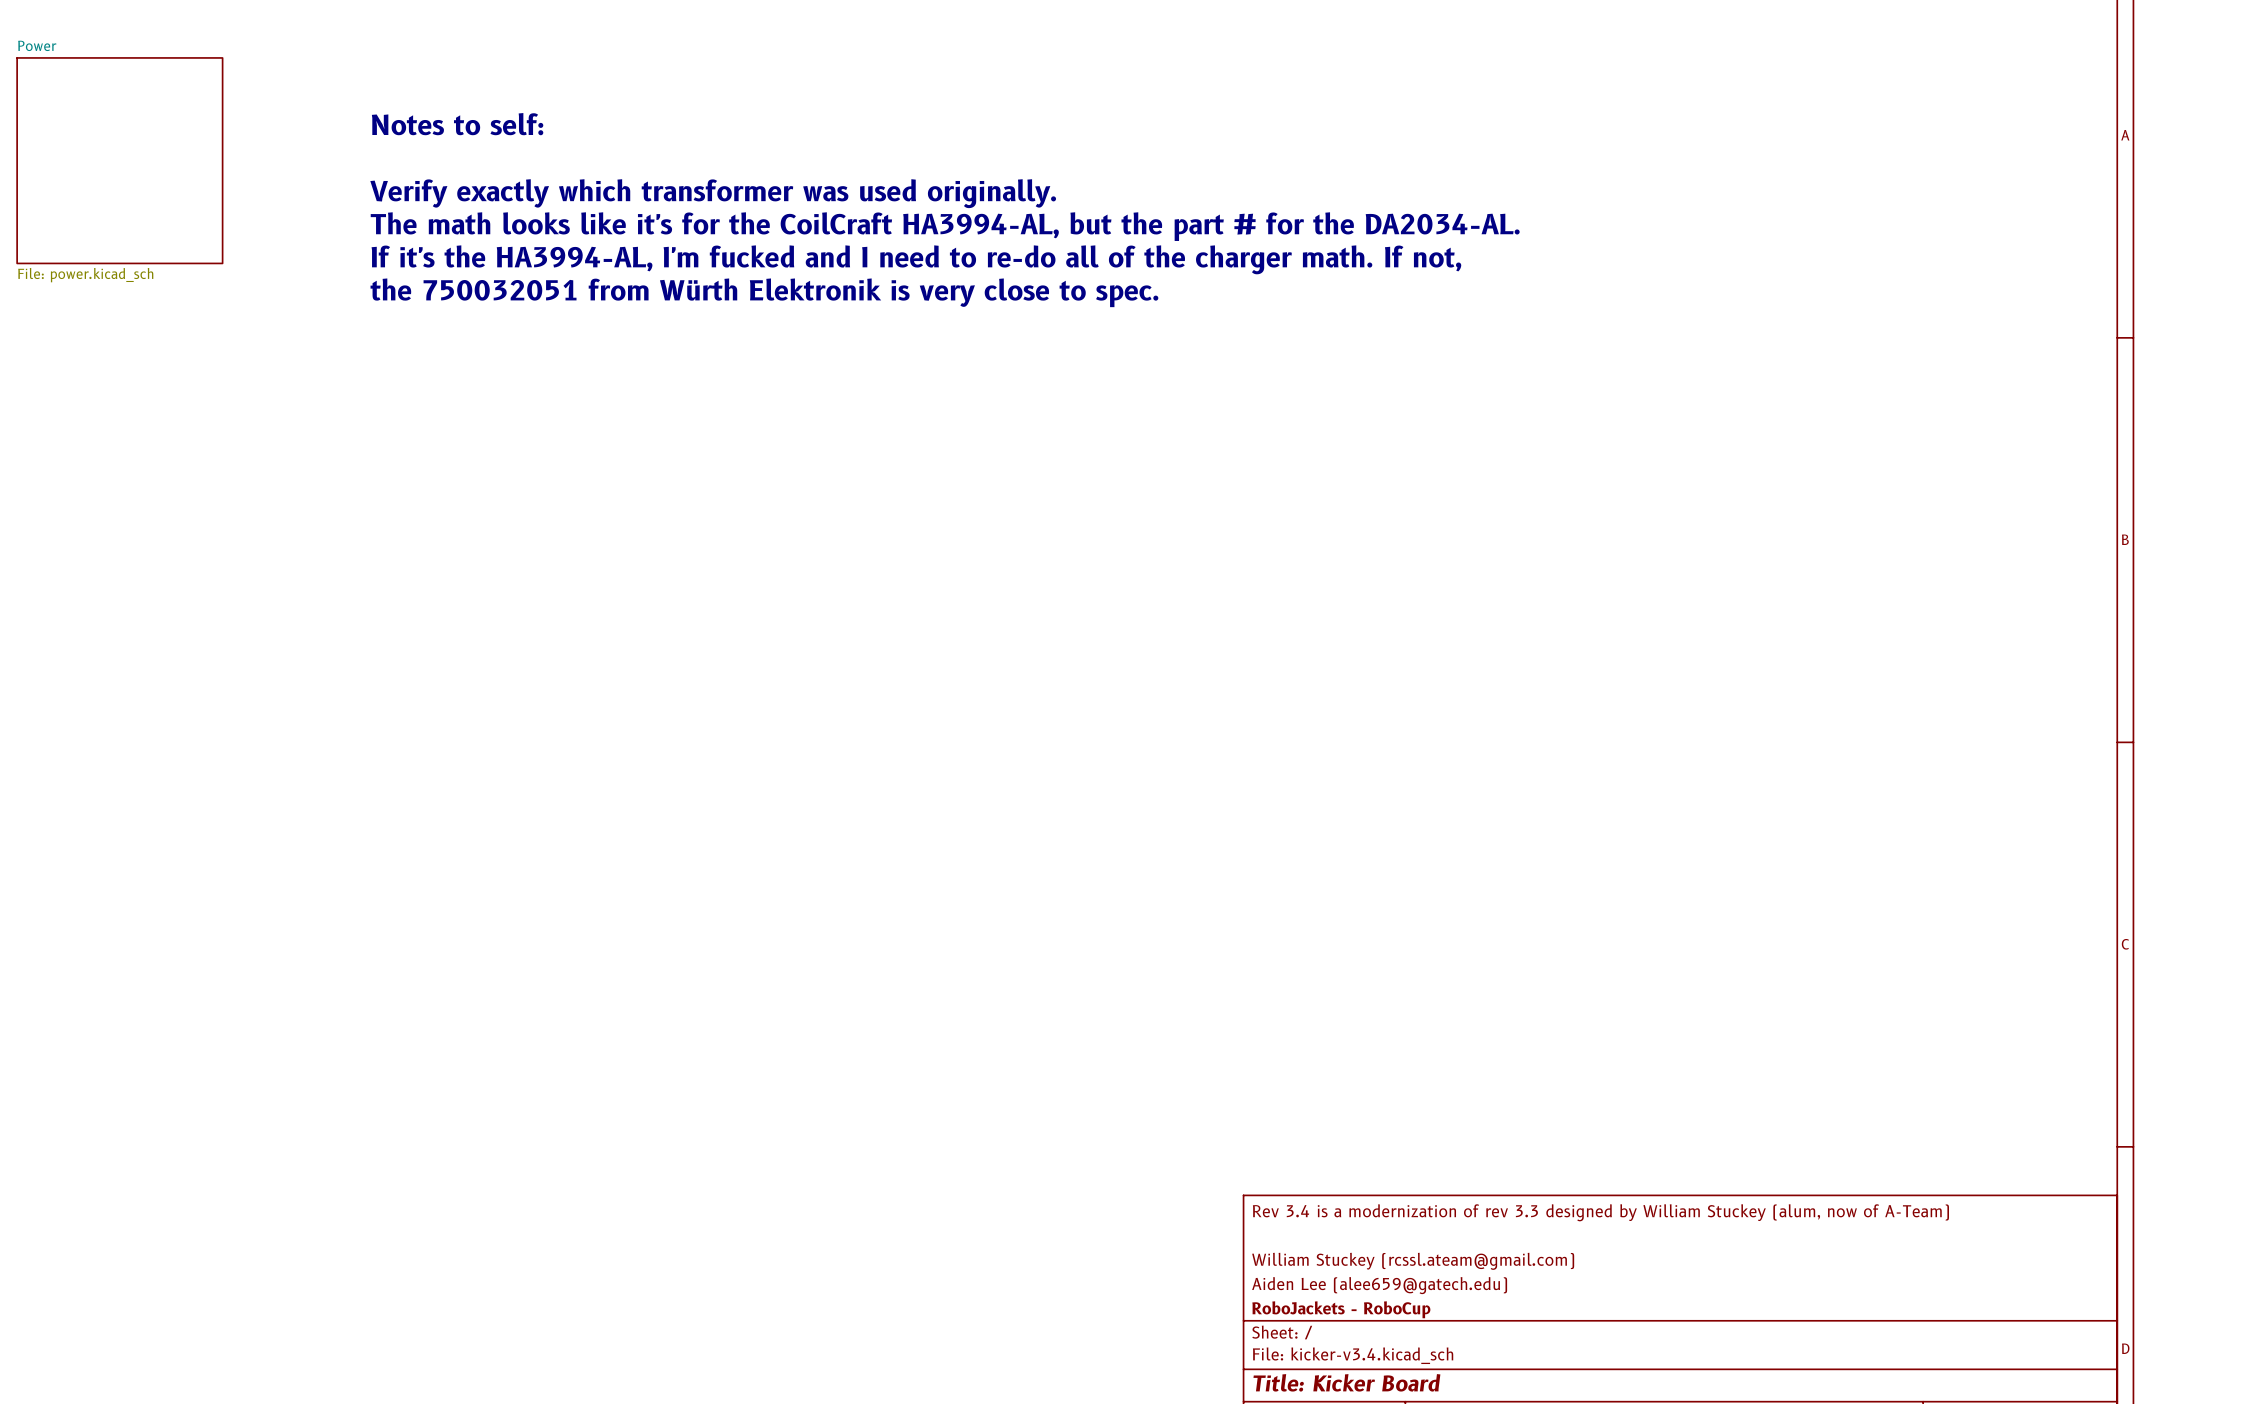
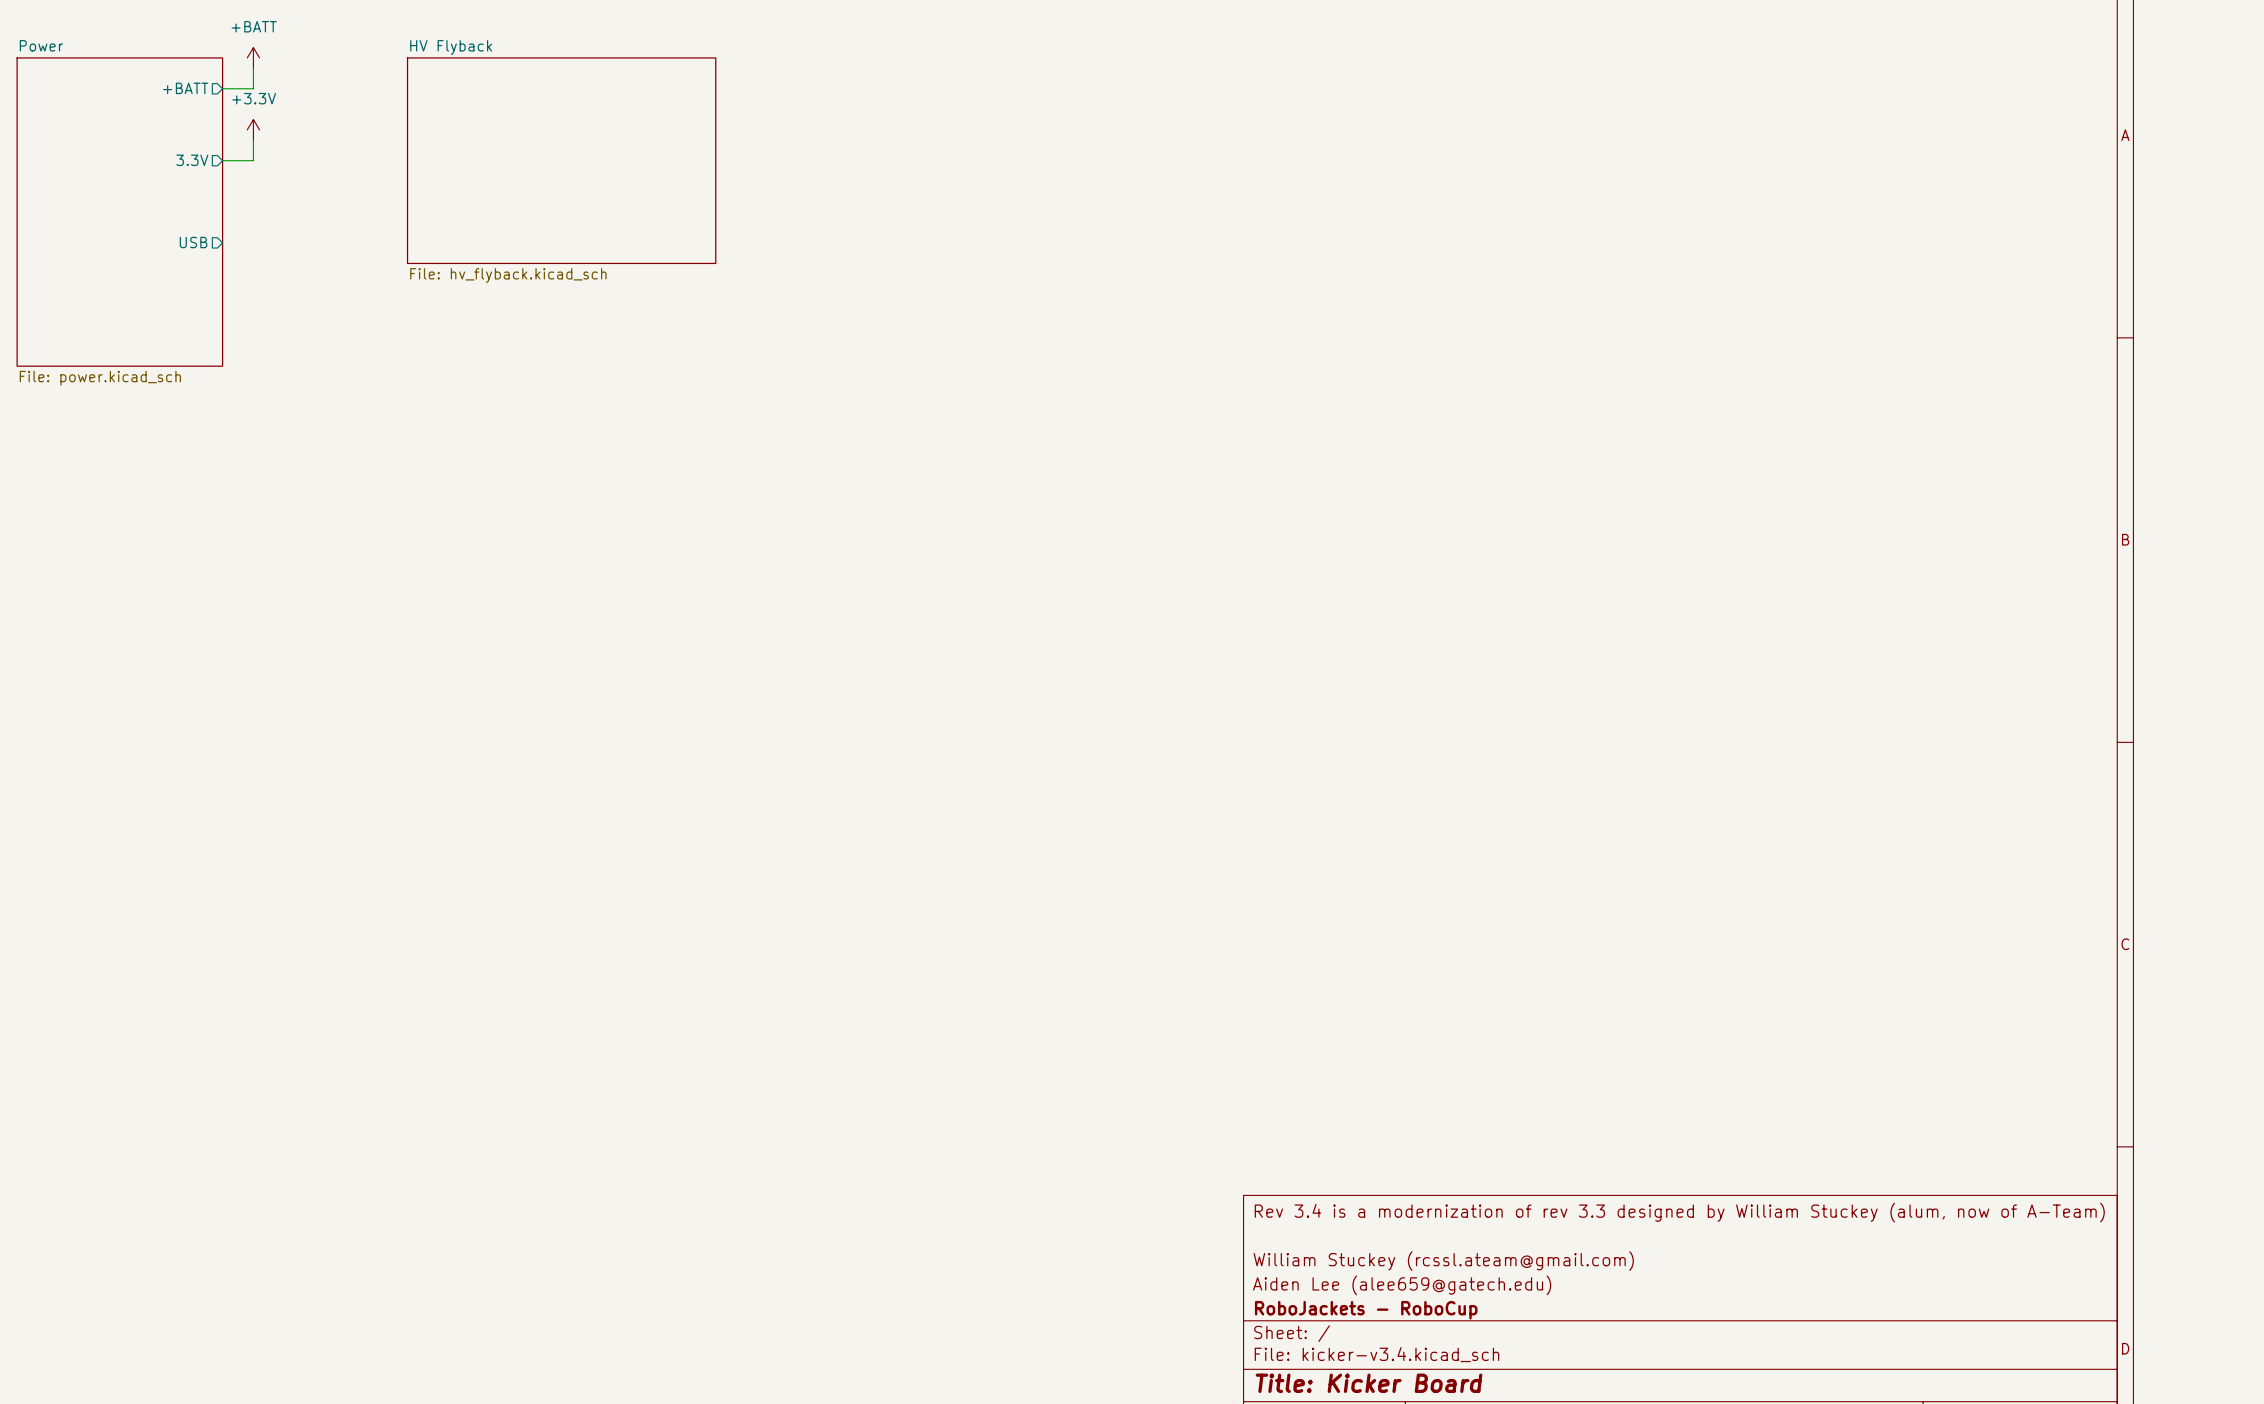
power symbol: none -> +BATT (253, 57)
wire: none -> (253, 68) (253, 88) (222, 88)
sheet pin: none -> +BATT (185, 88)
text: Notes to self: (457, 124) -> none
power symbol: none -> +3.3V (253, 129)
wire: none -> (253, 140) (253, 160) (222, 160)
sheet Power: File: power.kicad_sch (119, 160) -> none
sheet pin: none -> 3.3V (192, 160)
sheet HV Flyback: none -> File: hv_flyback.kicad_sch (561, 160)
text: Verify exactly which transformer was used originally. (713, 193) -> none
sheet Power: none -> File: power.kicad_sch (119, 212)
text: The math looks like it's for the CoilCraft HA3994-AL, but the part # for the DA2034-AL. (945, 226) -> none
sheet pin: none -> USB (193, 242)
text: If it's the HA3994-AL, I'm fucked and I need to re-do all of the charger math. If not, (916, 259) -> none
text: the 750032051 from Würth Elektronik is very close to spec. (764, 292) -> none

